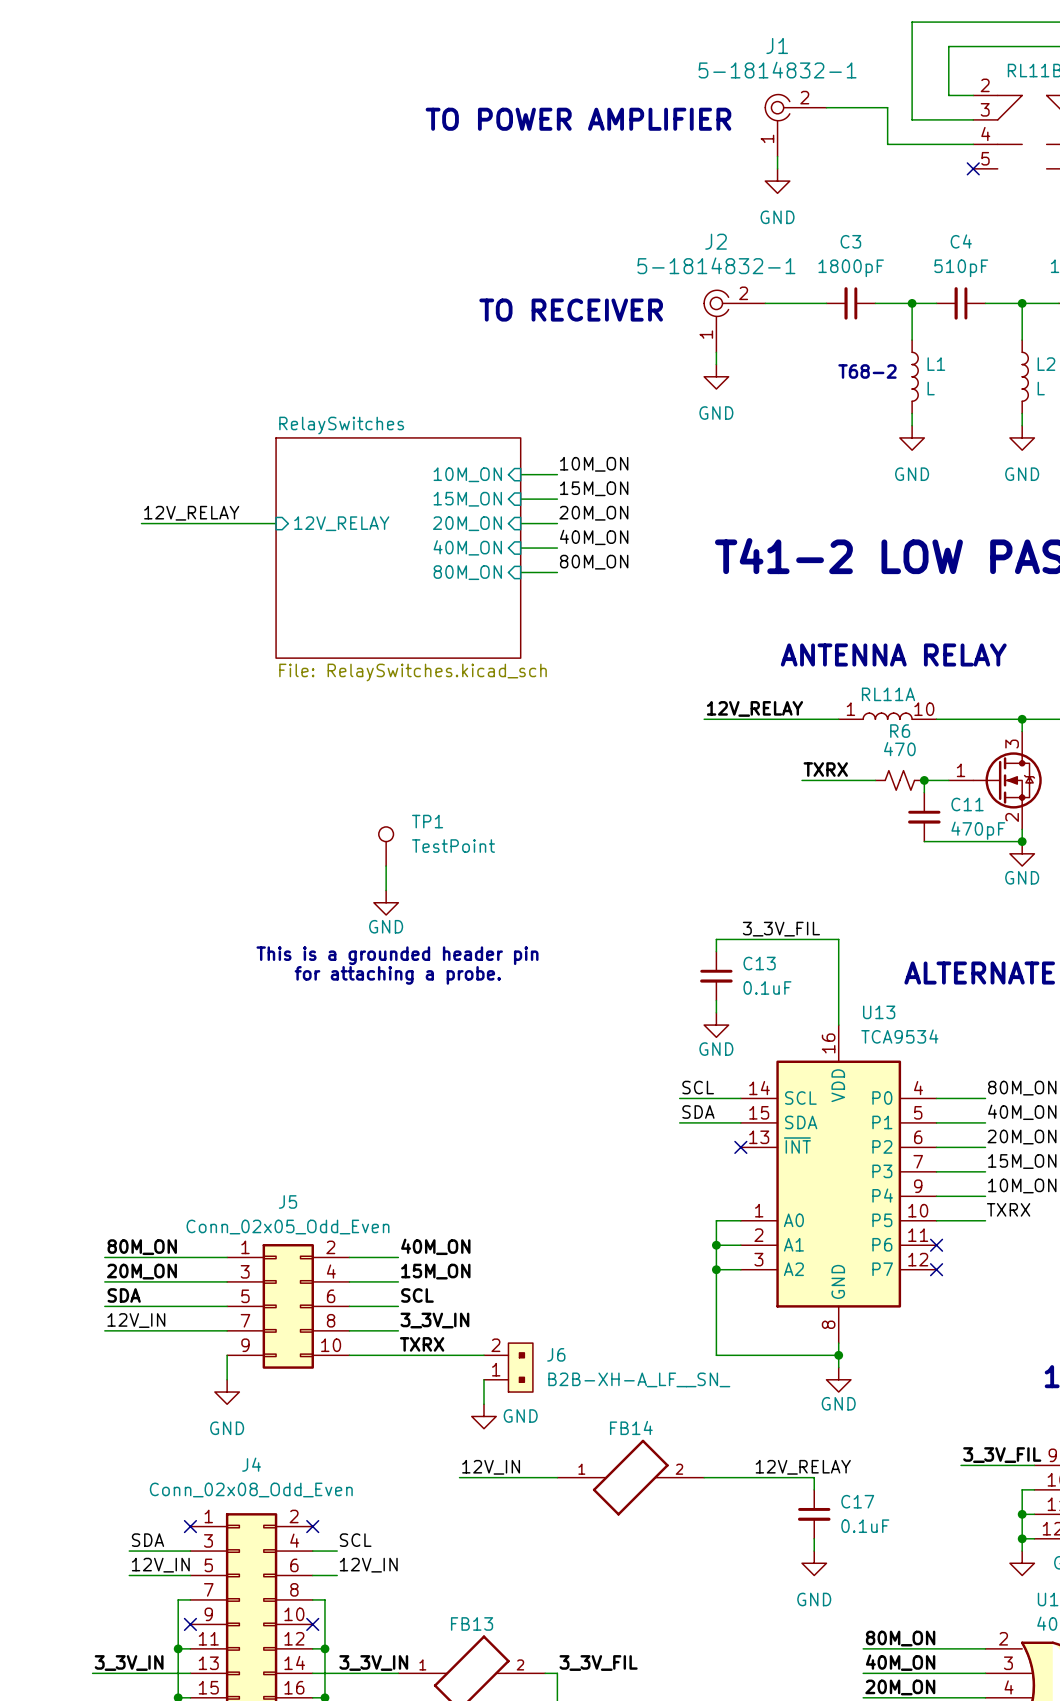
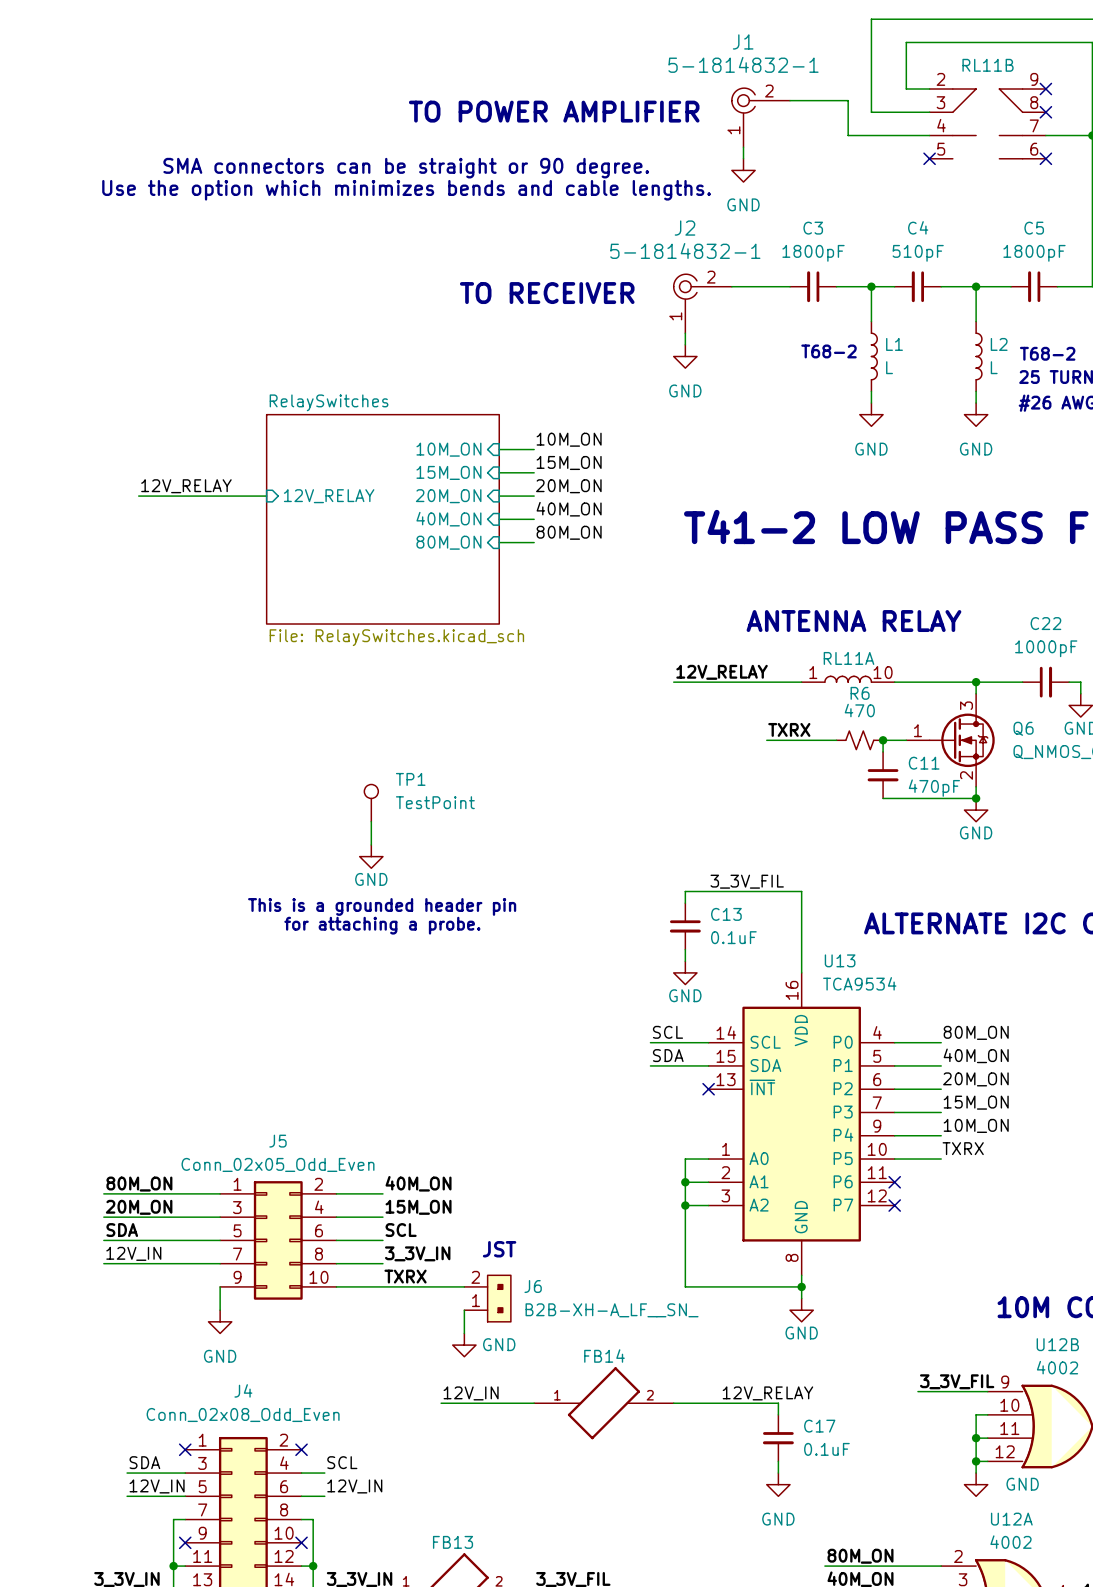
text: none -> SMA connectors can be straight or 90 degree. (406, 168)
text: none -> Use the option which minimizes bends and cable lengths. (406, 190)
text: none -> JST (499, 1249)

